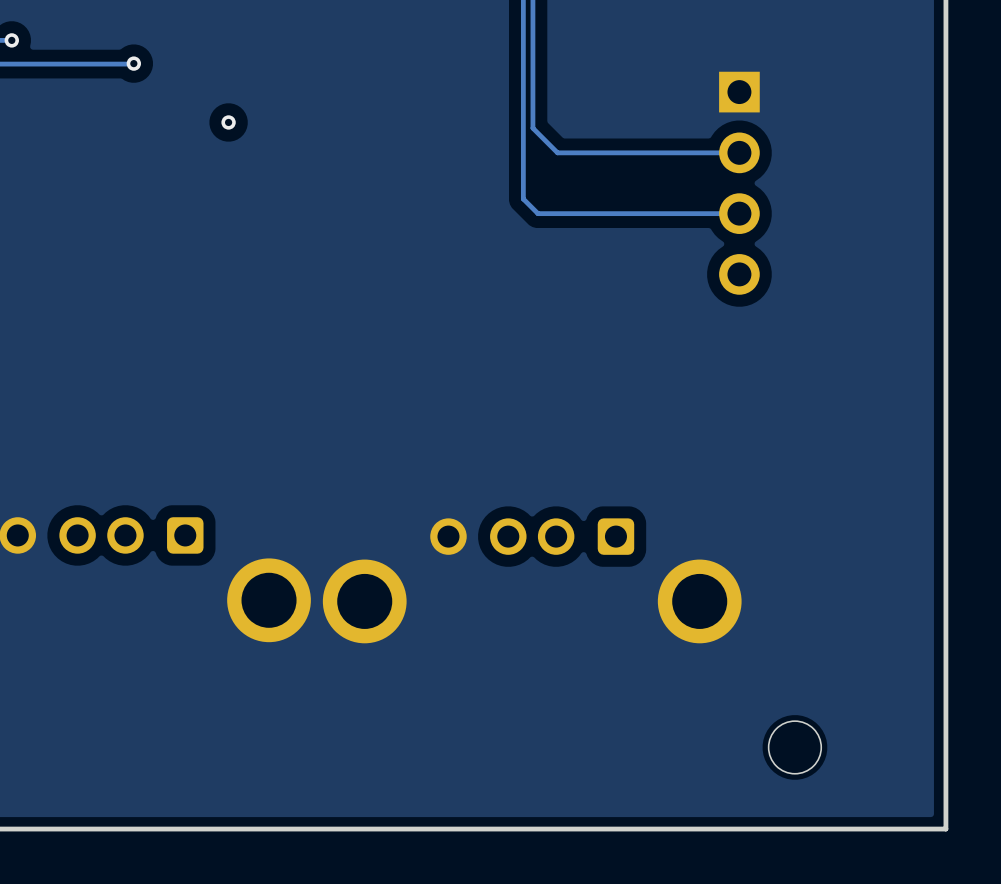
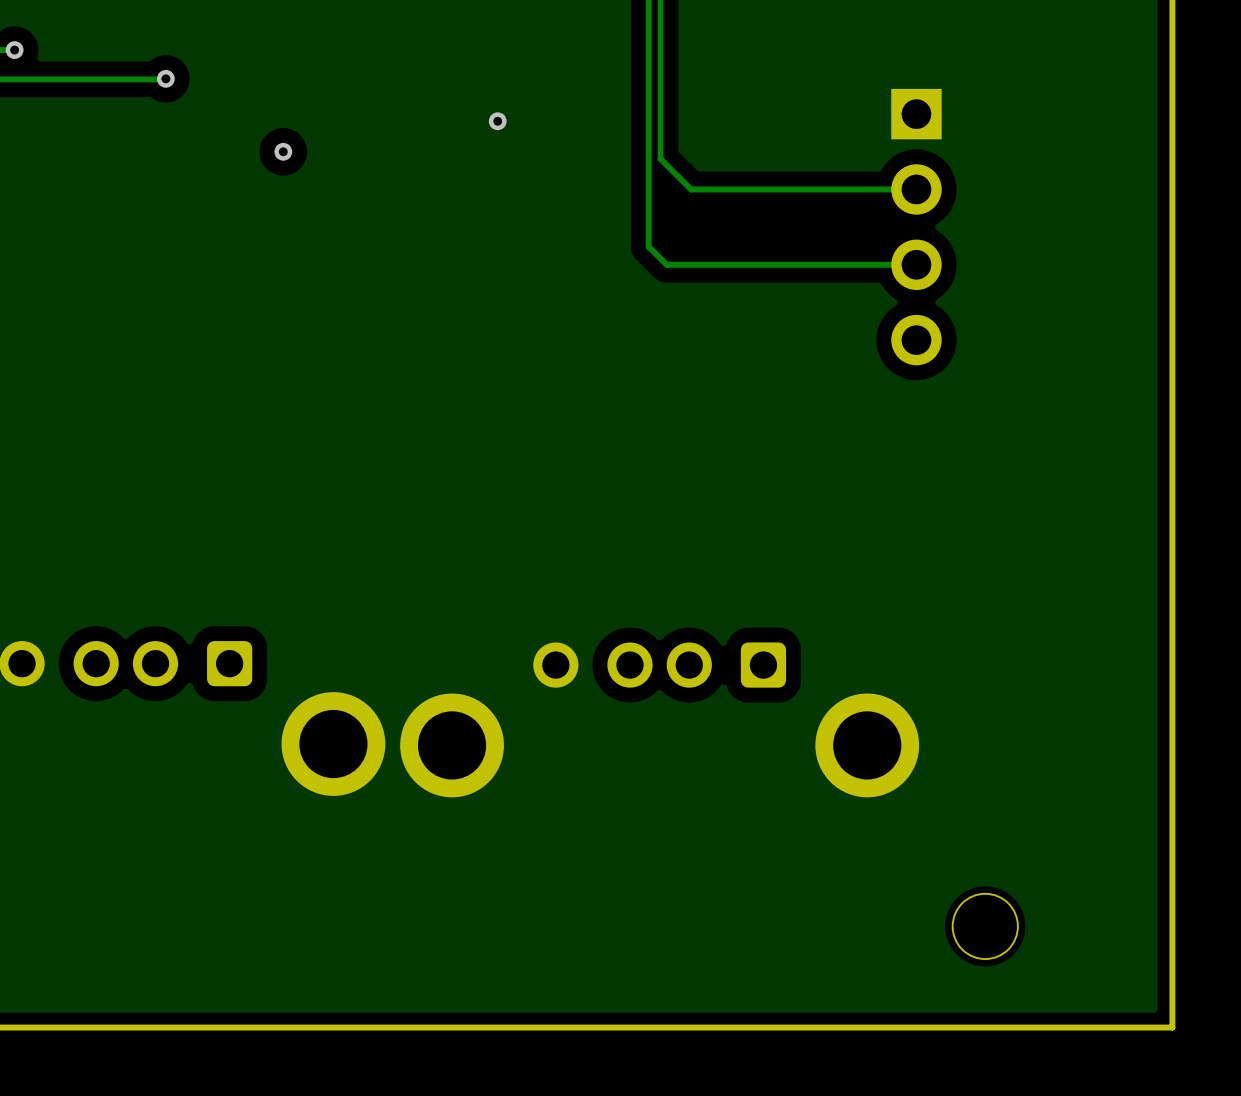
via: none -> (497, 121)

